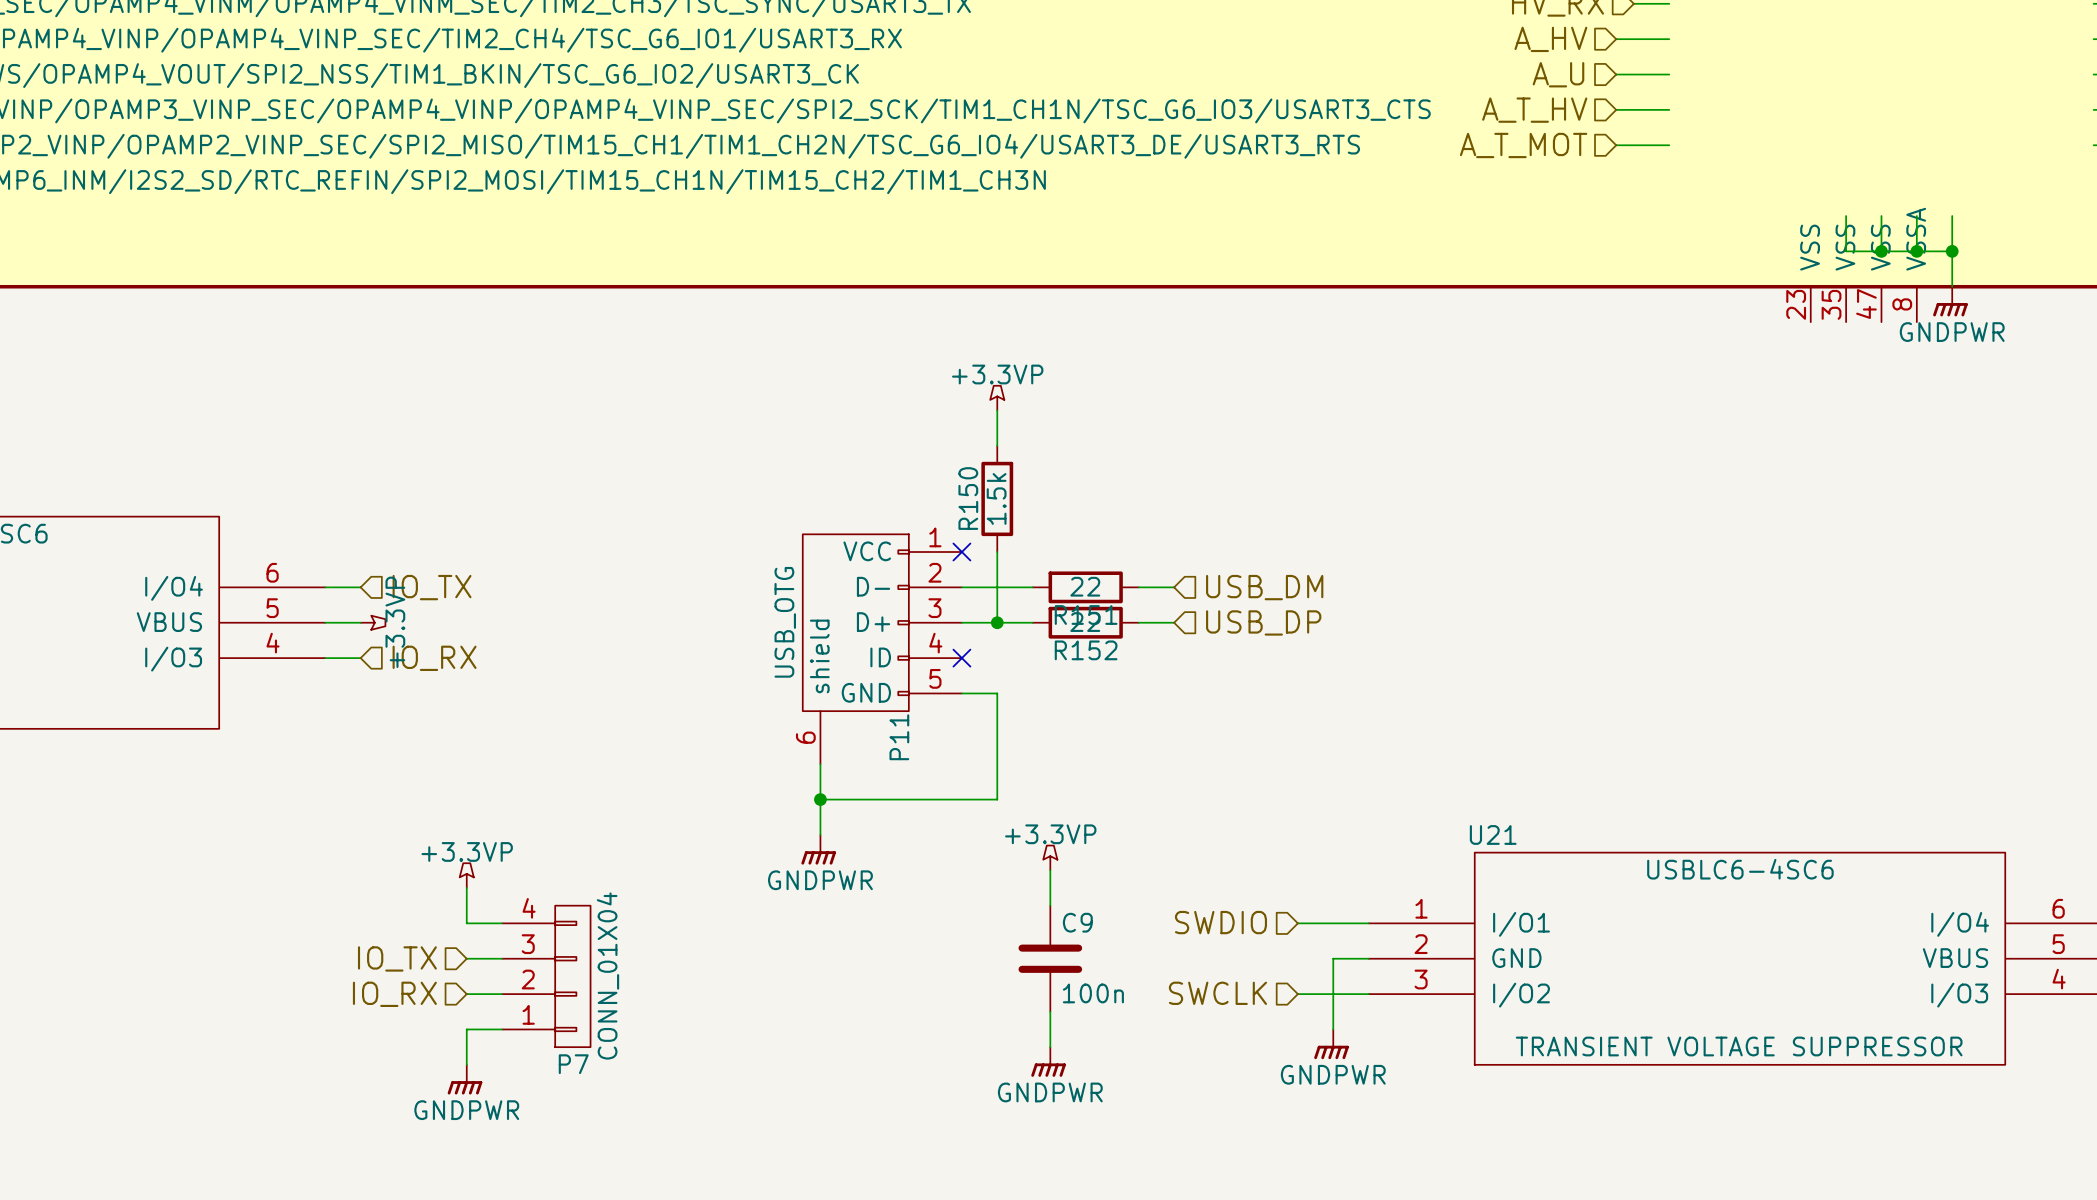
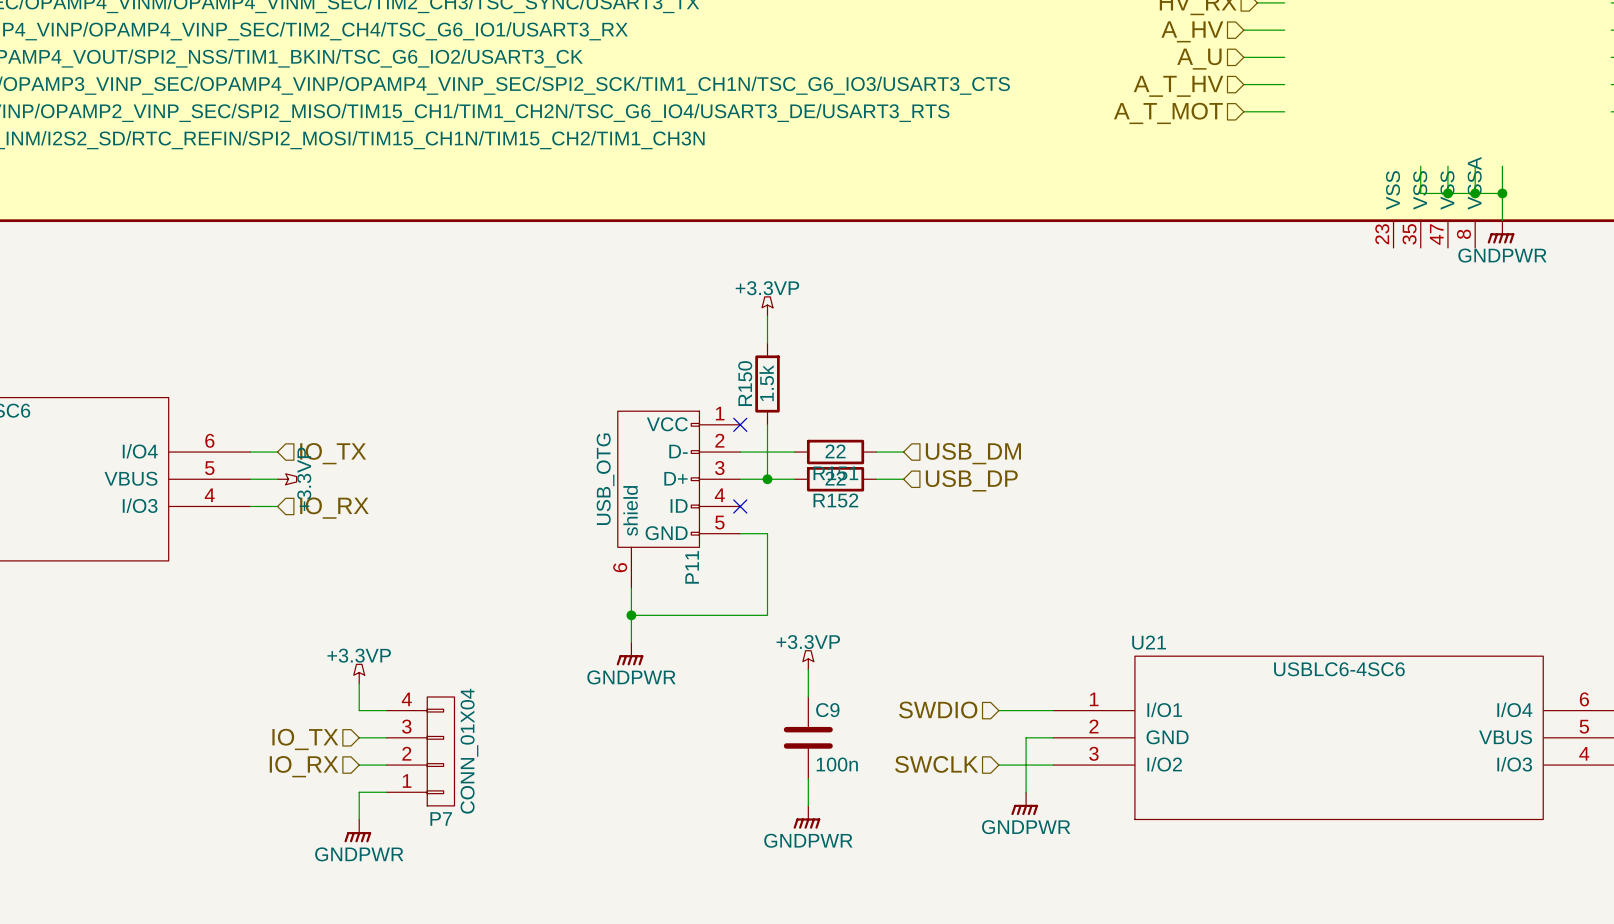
U21 text: TRANSIENT VOLTAGE SUPPRESSOR (1739, 1046) -> none

